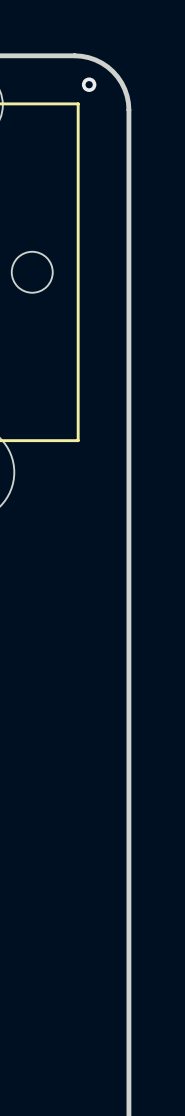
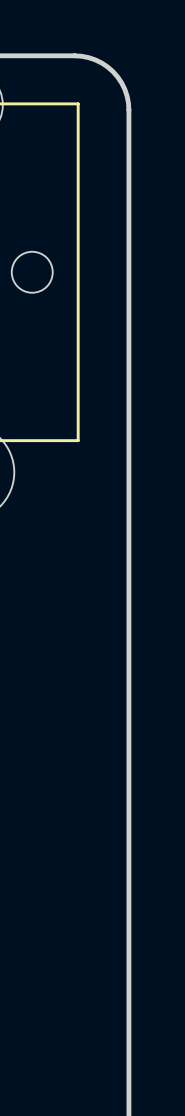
via: (89, 84) -> none

